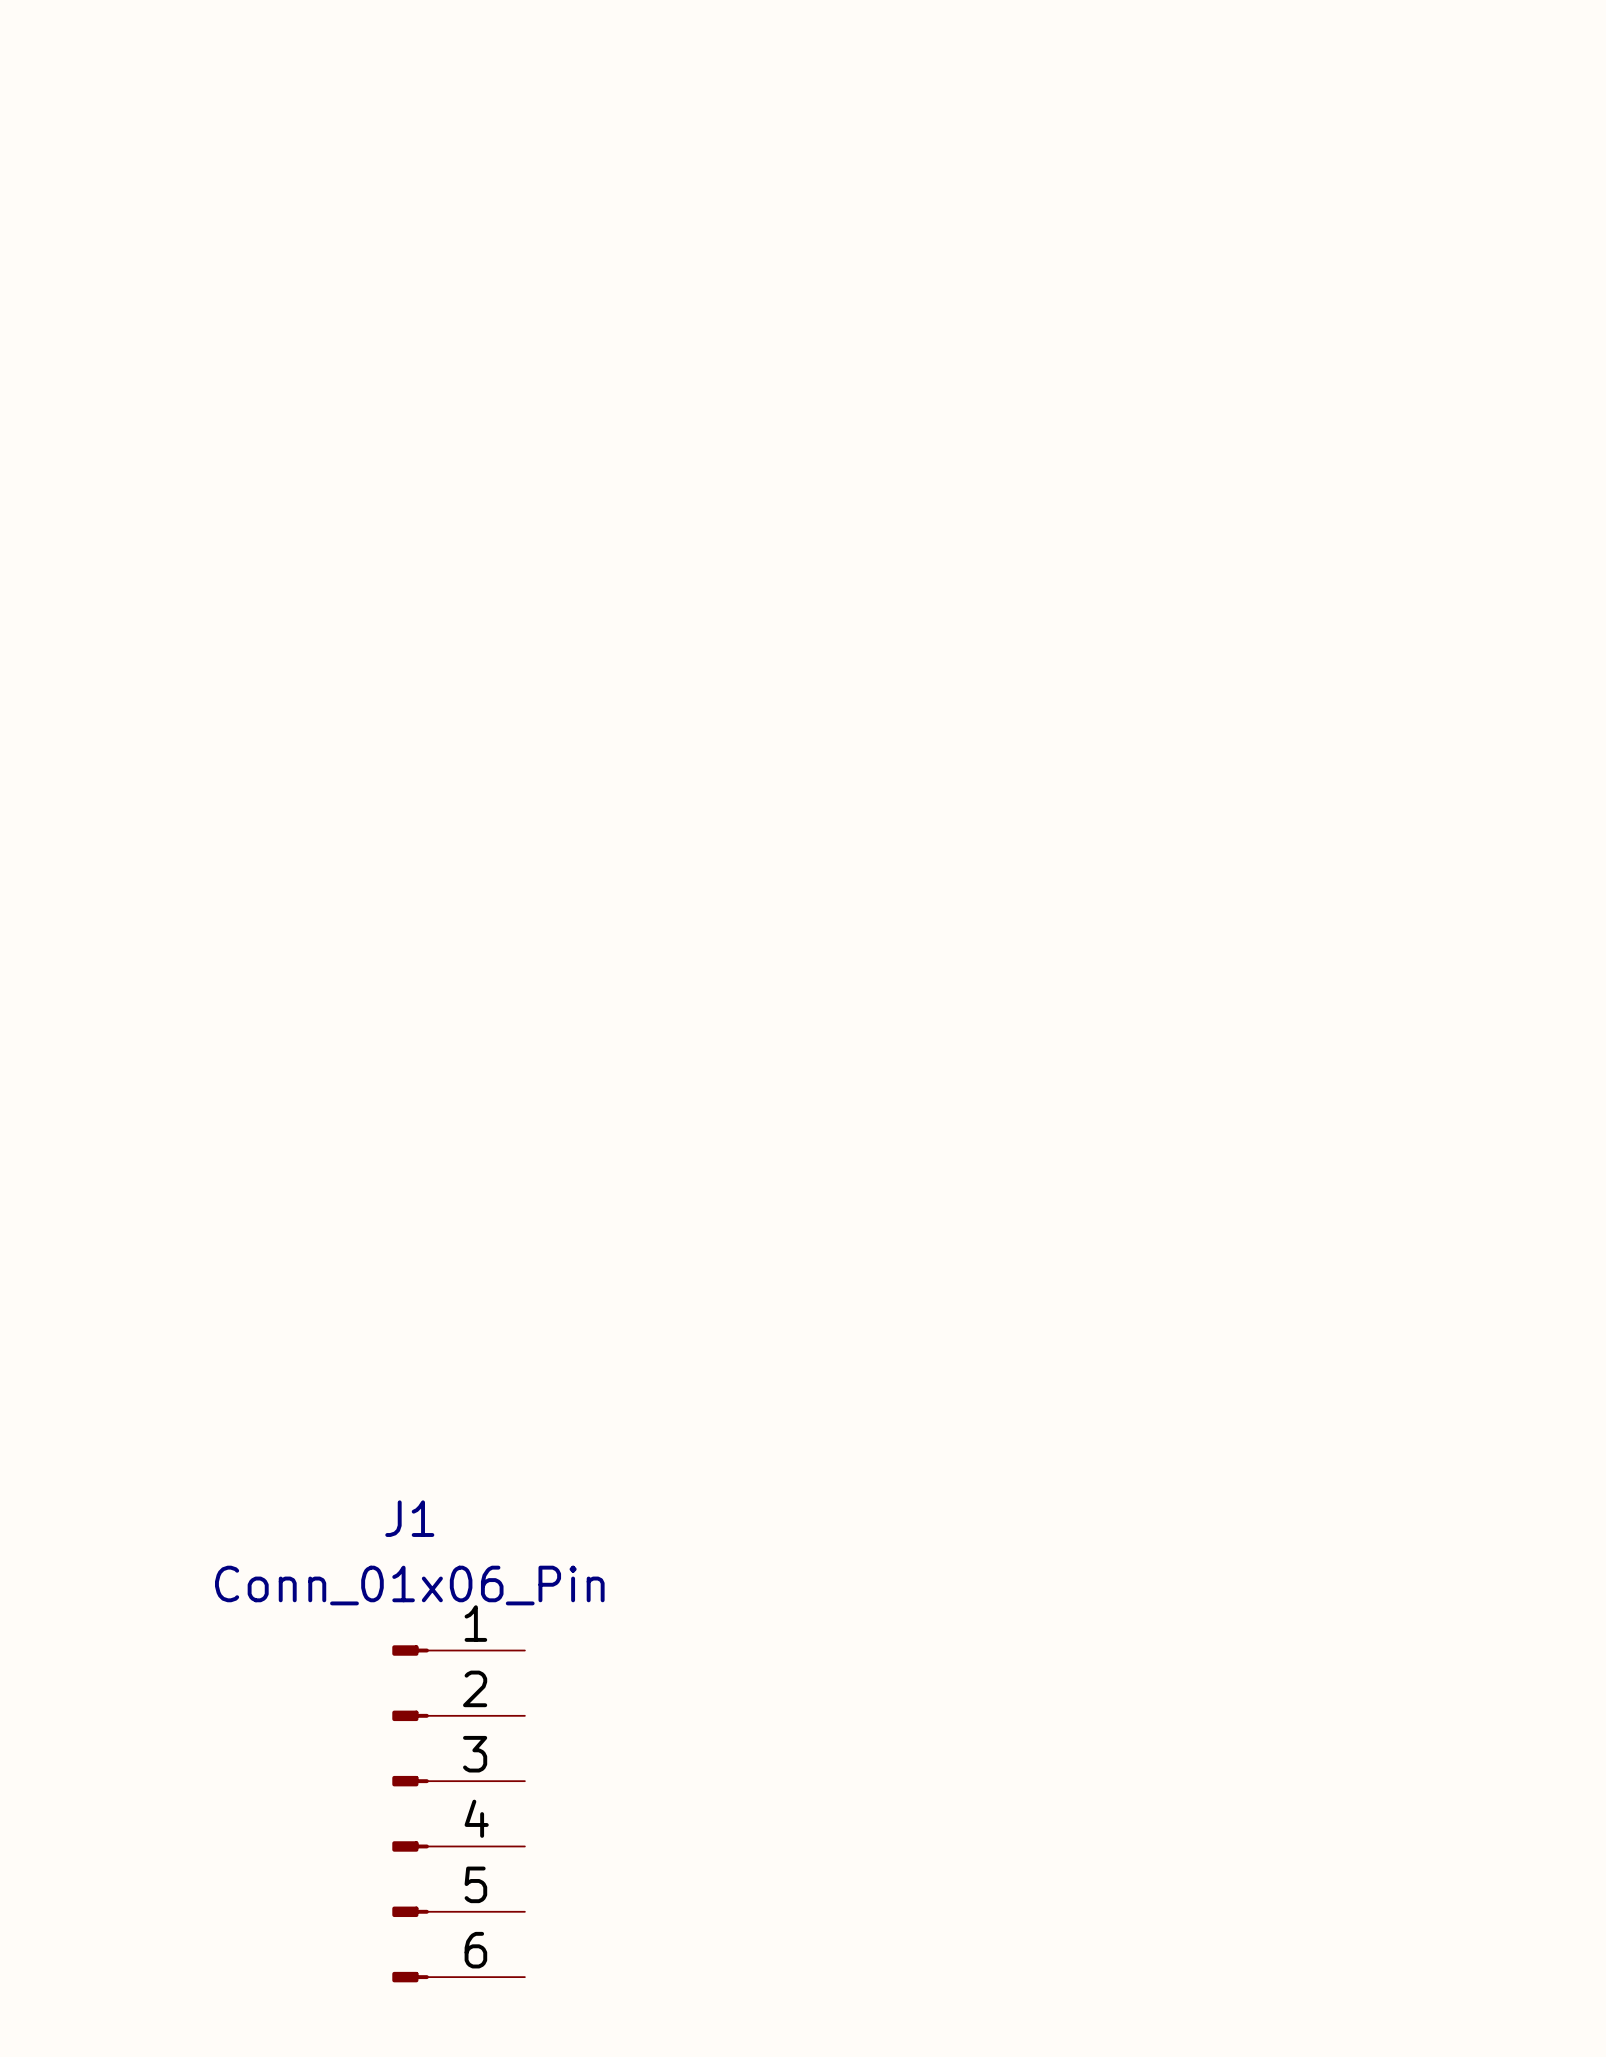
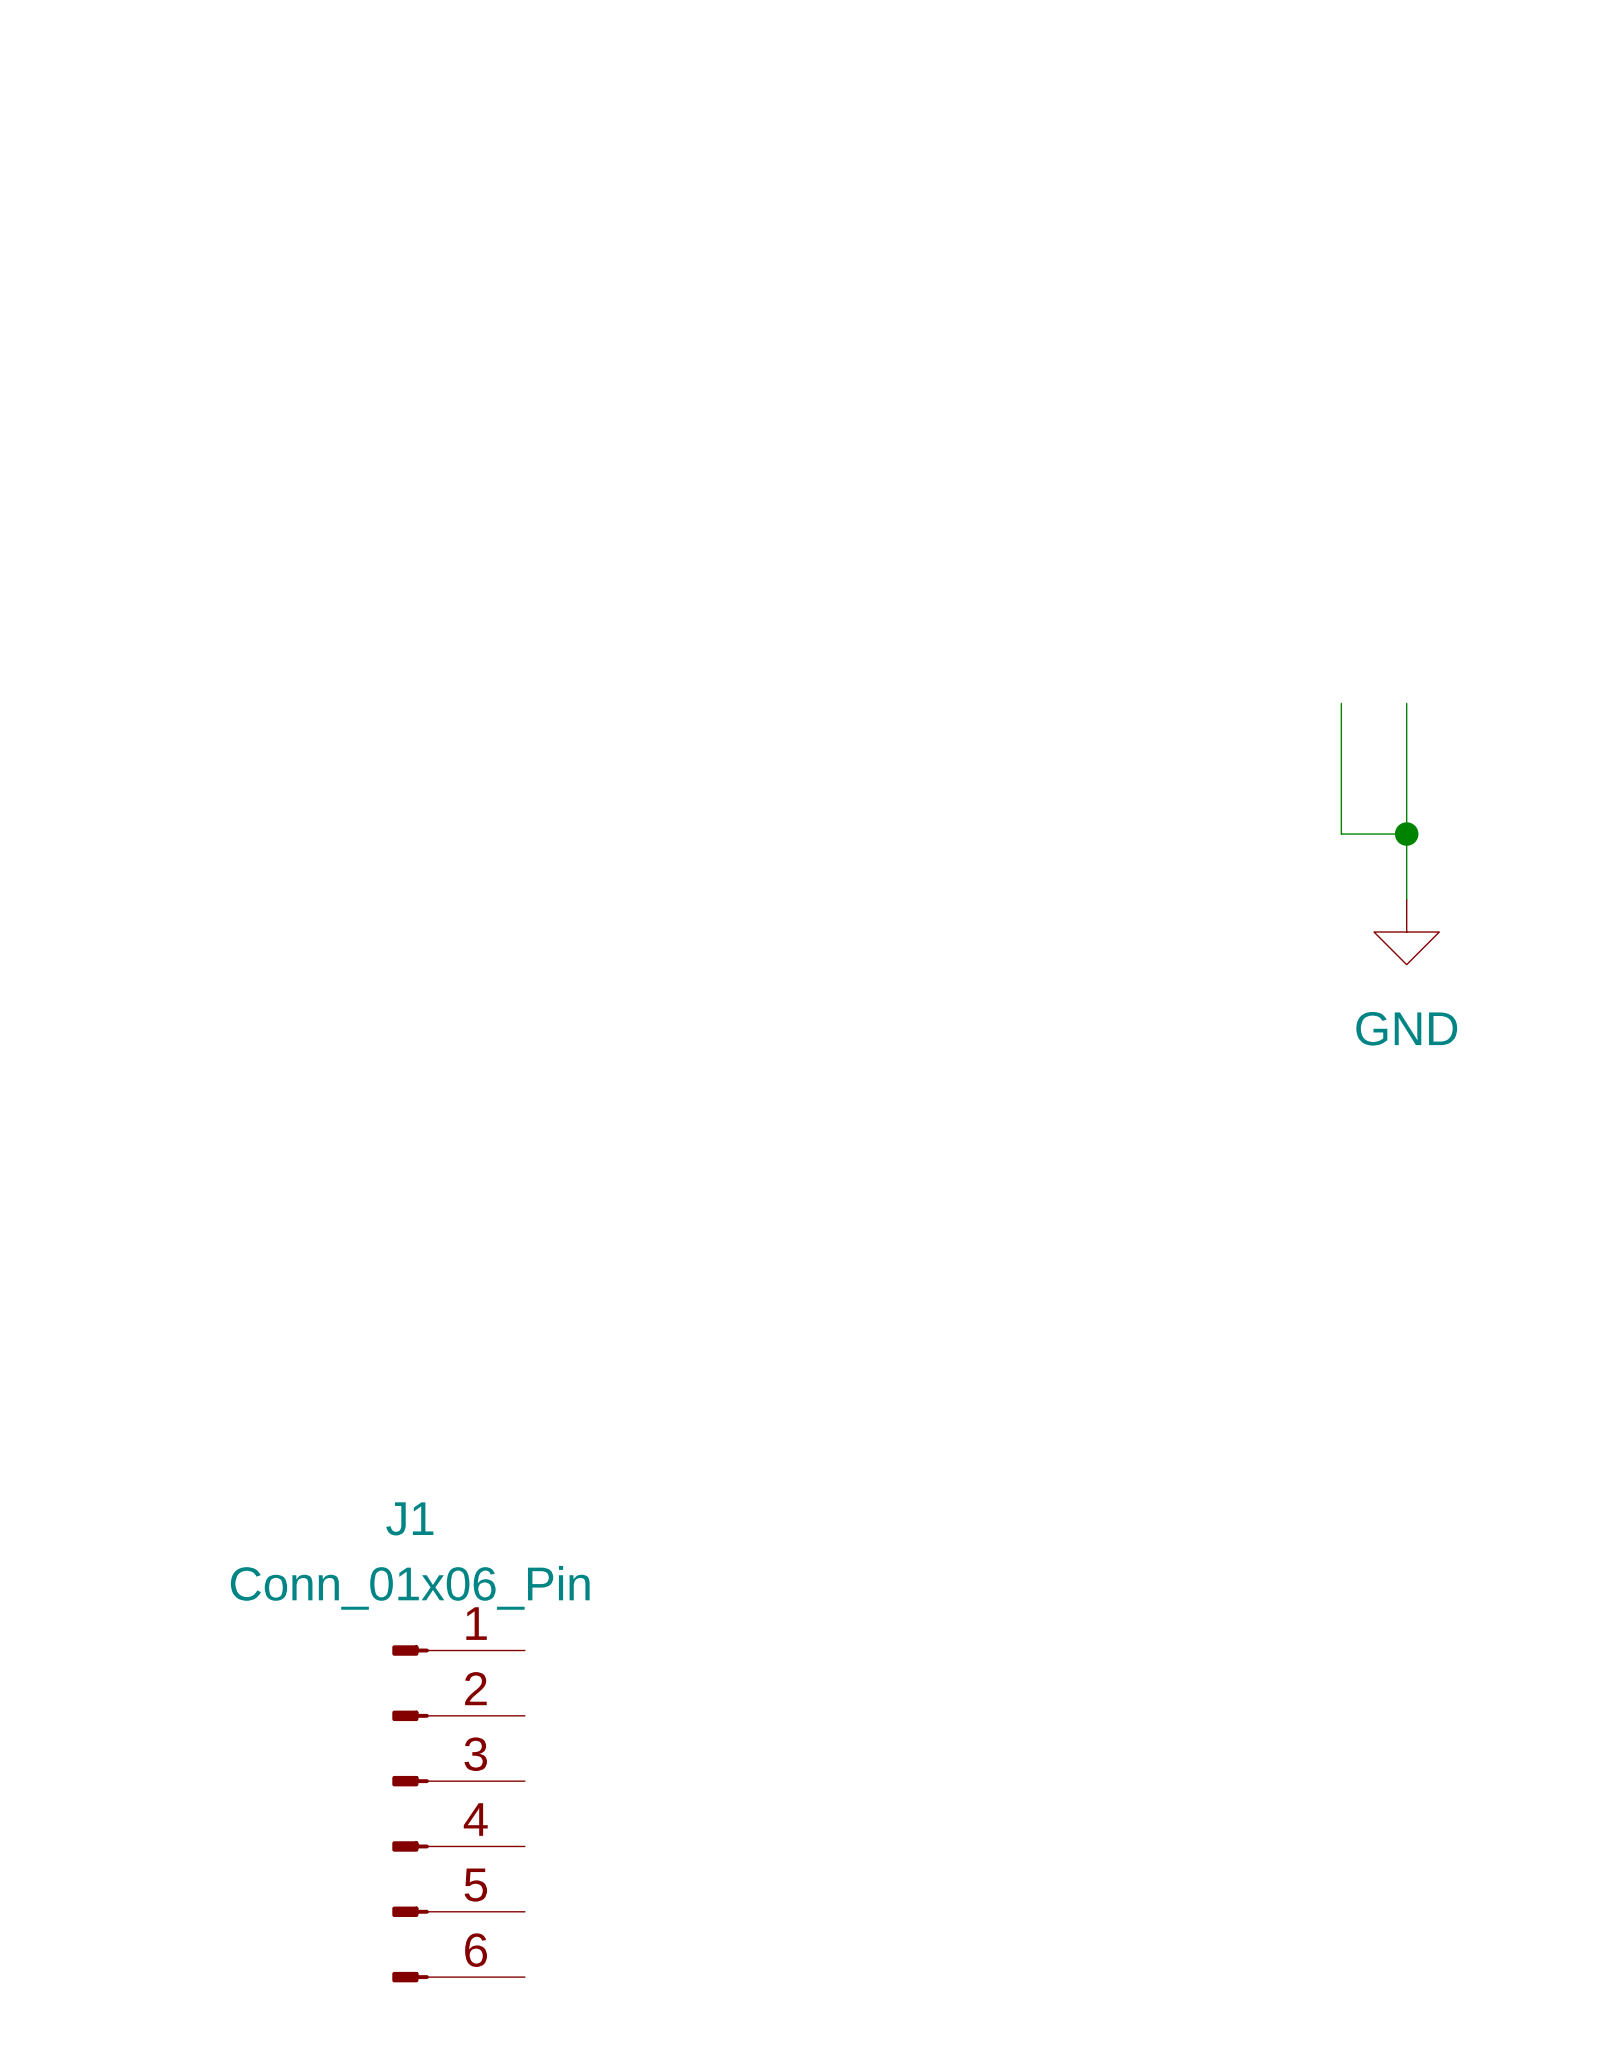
wire: none -> (1341, 703) (1341, 834) (1406, 834)
wire: none -> (1406, 703) (1406, 899)
junction: none -> (1406, 834)
power symbol: none -> GND (1406, 932)

